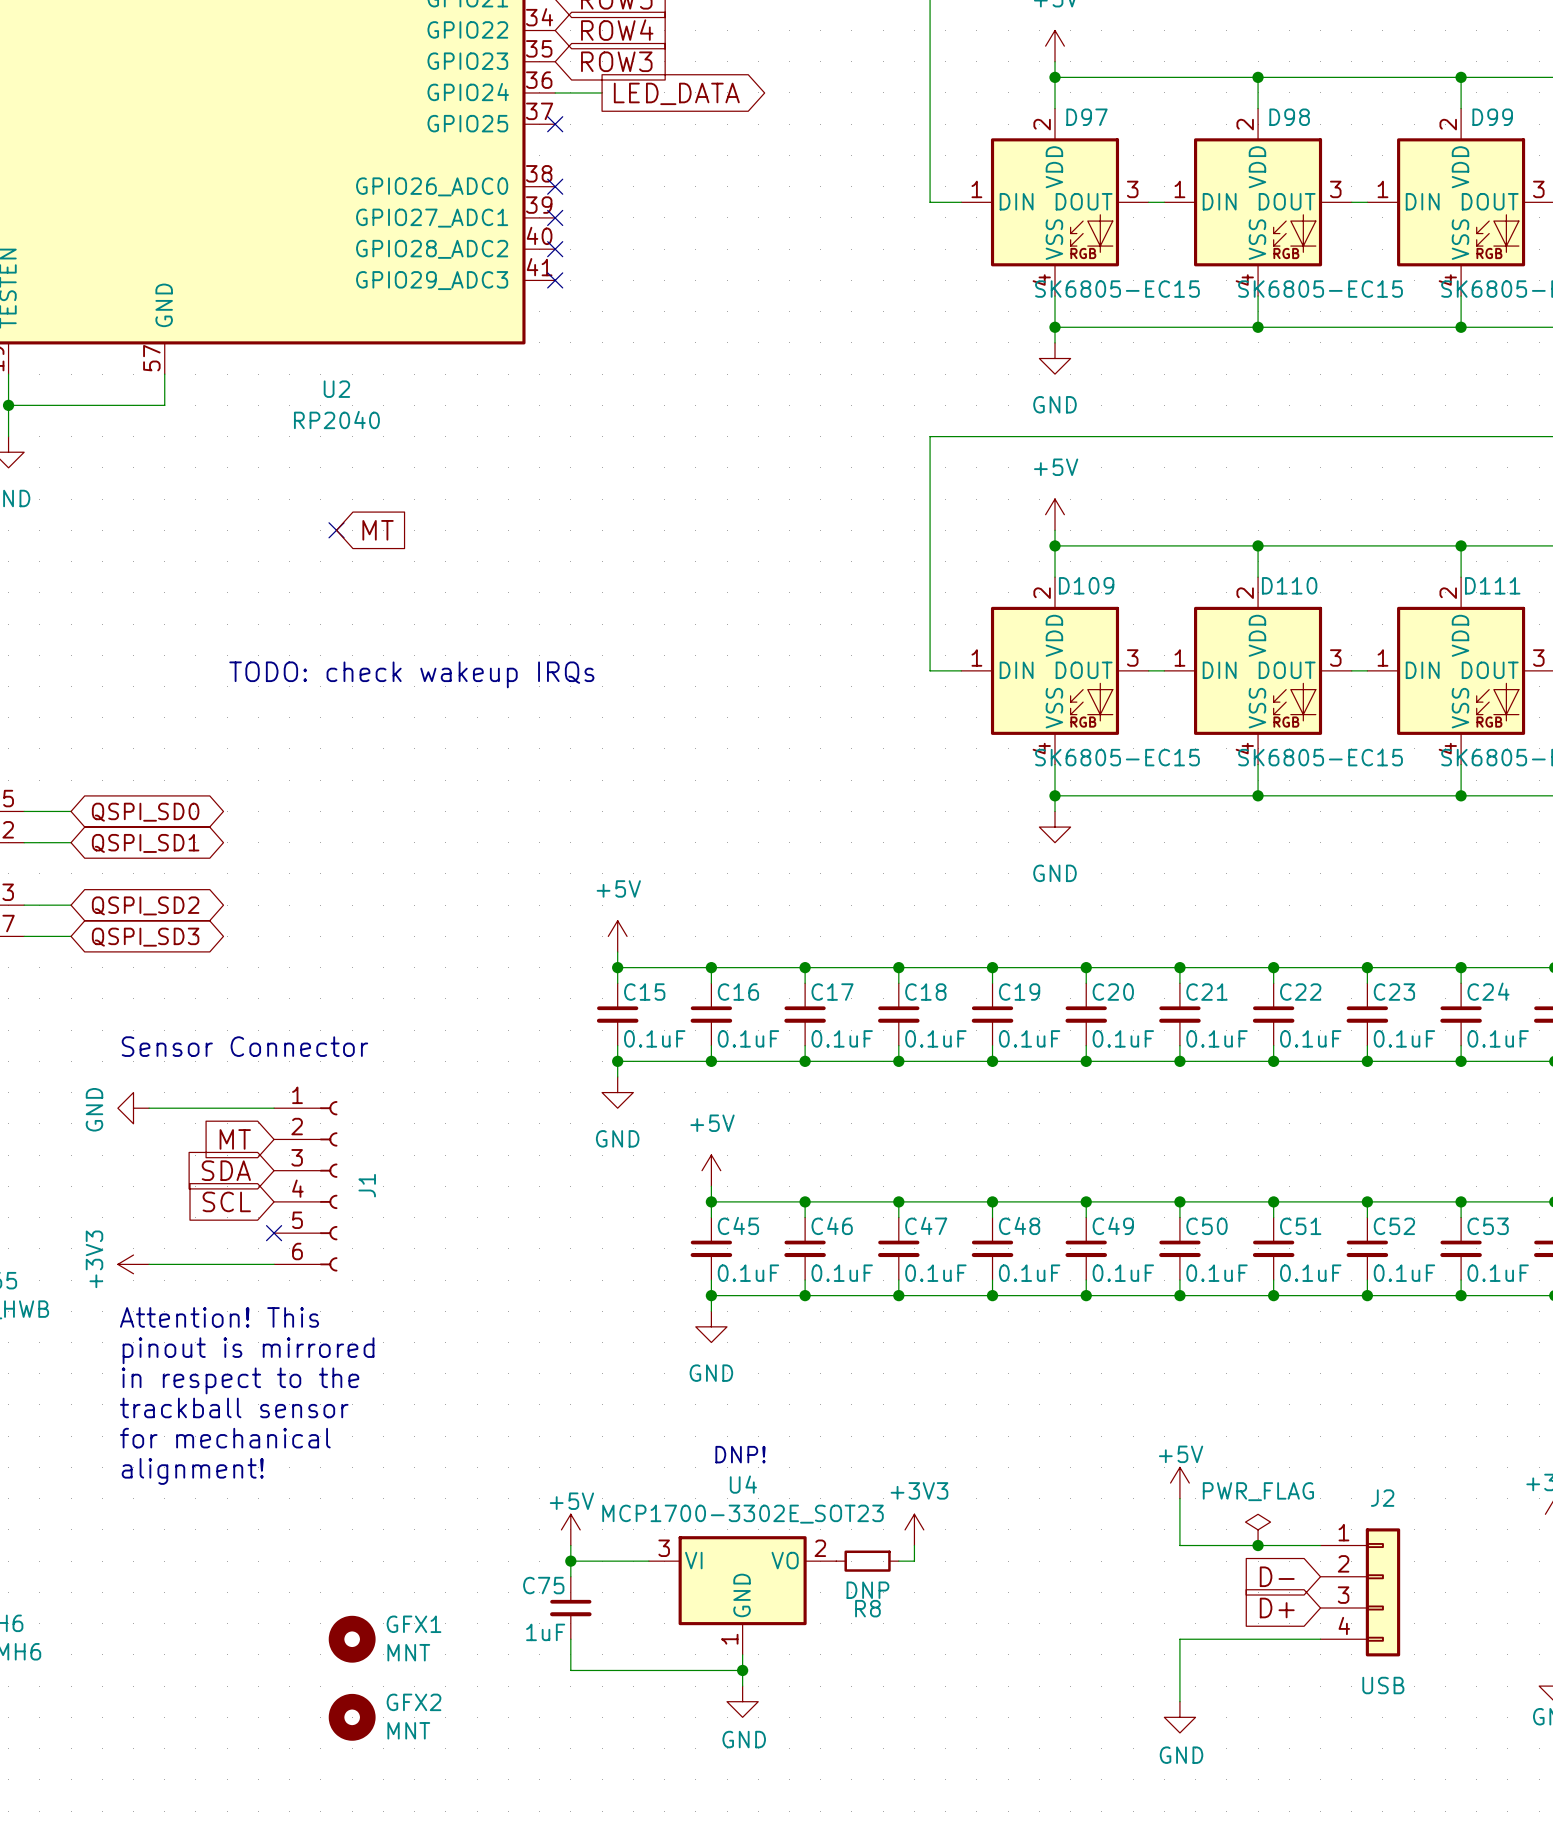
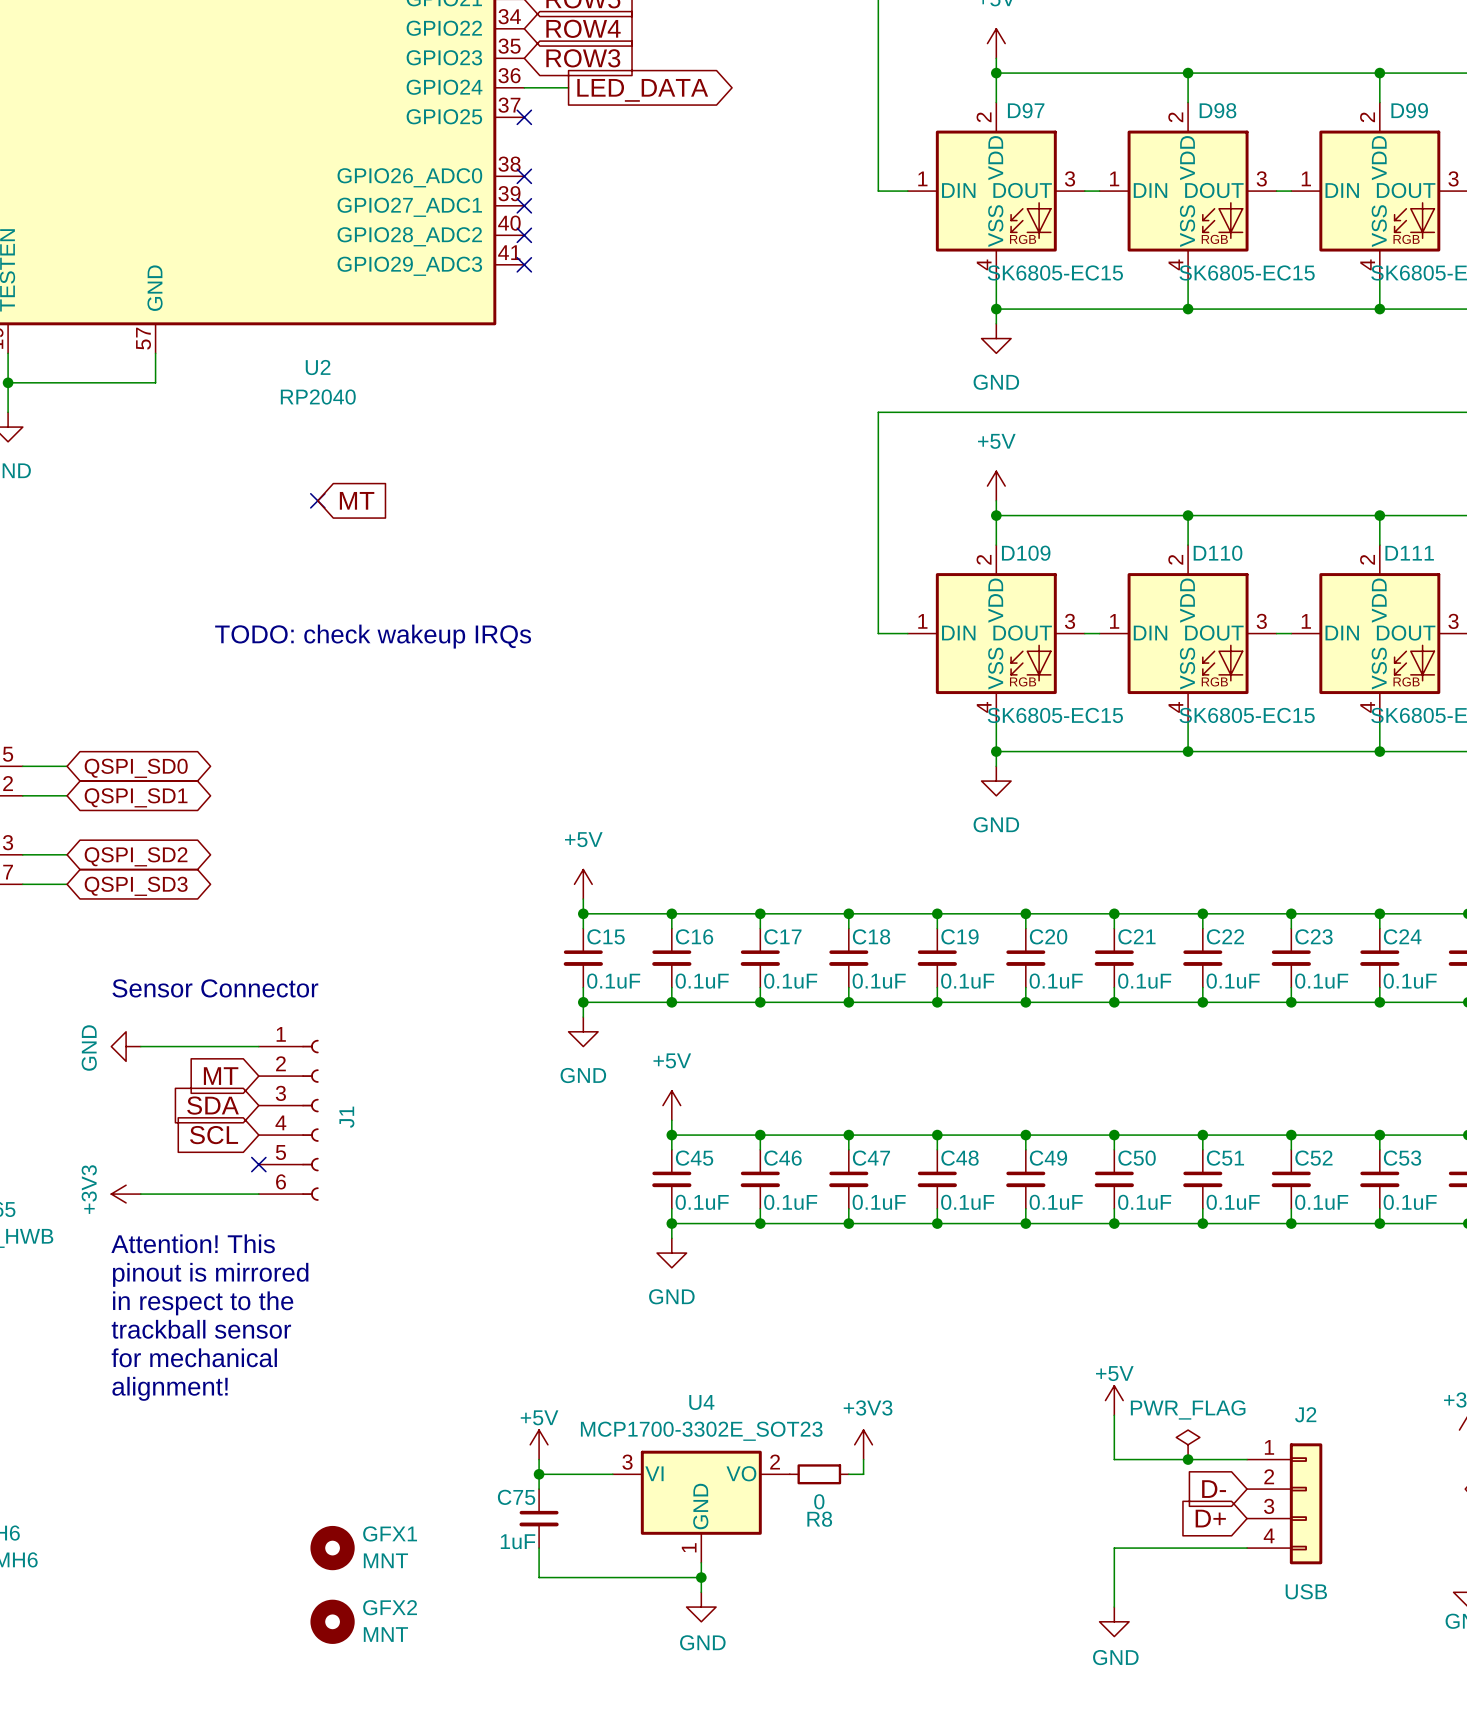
text: DNP! (740, 1454) -> none
R8 value: DNP (867, 1590) -> 0 (819, 1501)

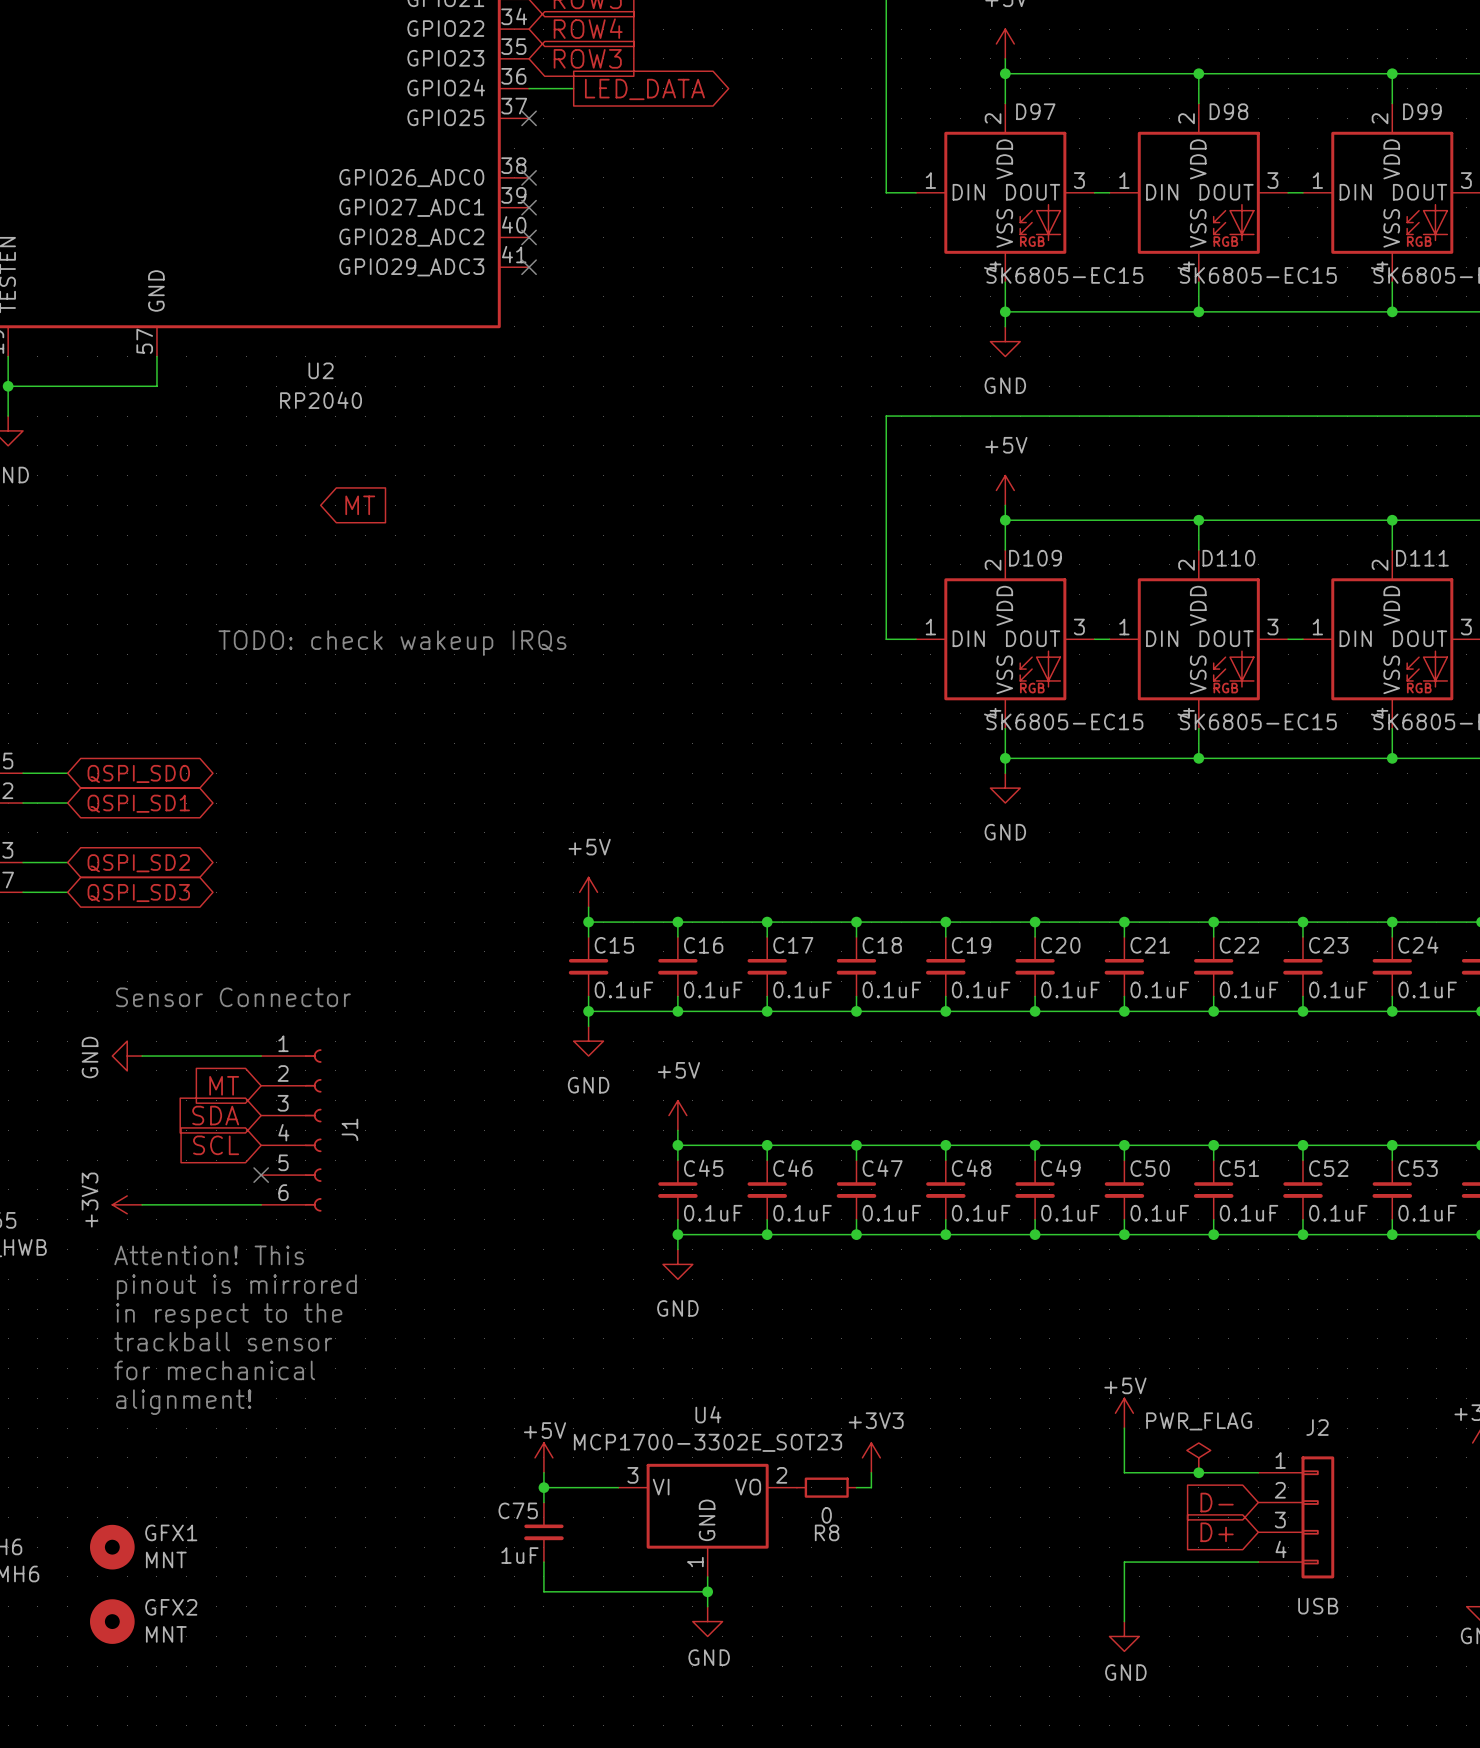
no-connect mark: (317, 500) -> none
GFX1 position: (332, 1548) -> (112, 1547)
GFX2 position: (332, 1621) -> (112, 1621)

